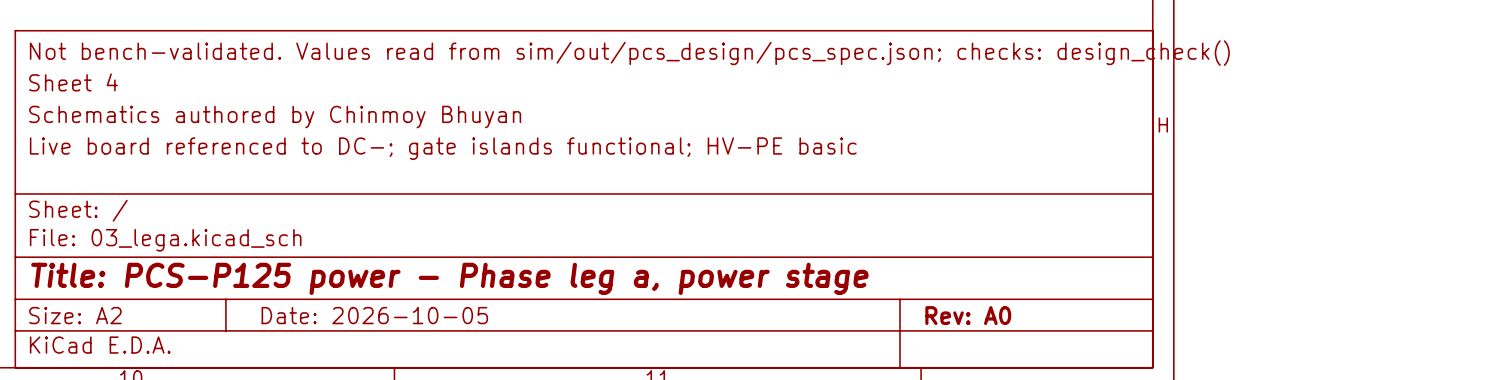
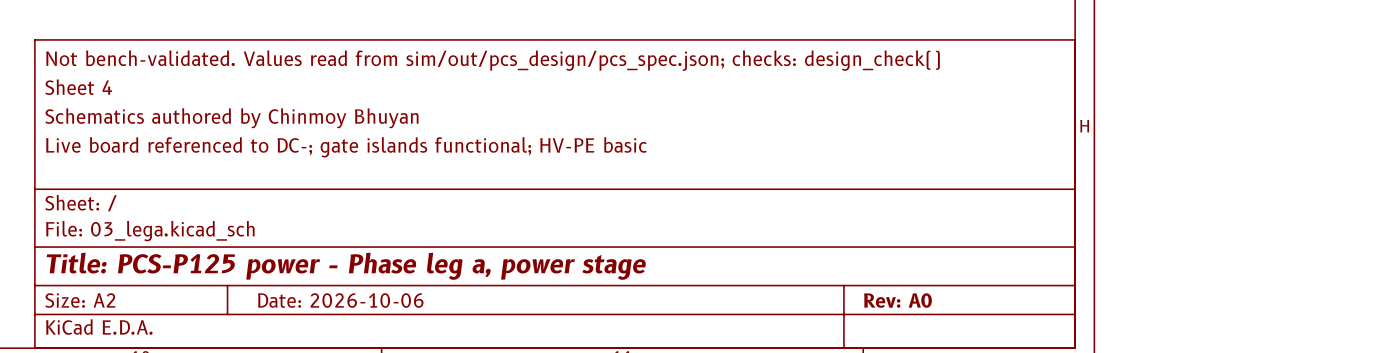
title block: Date: 2026-10-05 (374, 315) -> Date: 2026-10-06 (340, 300)

